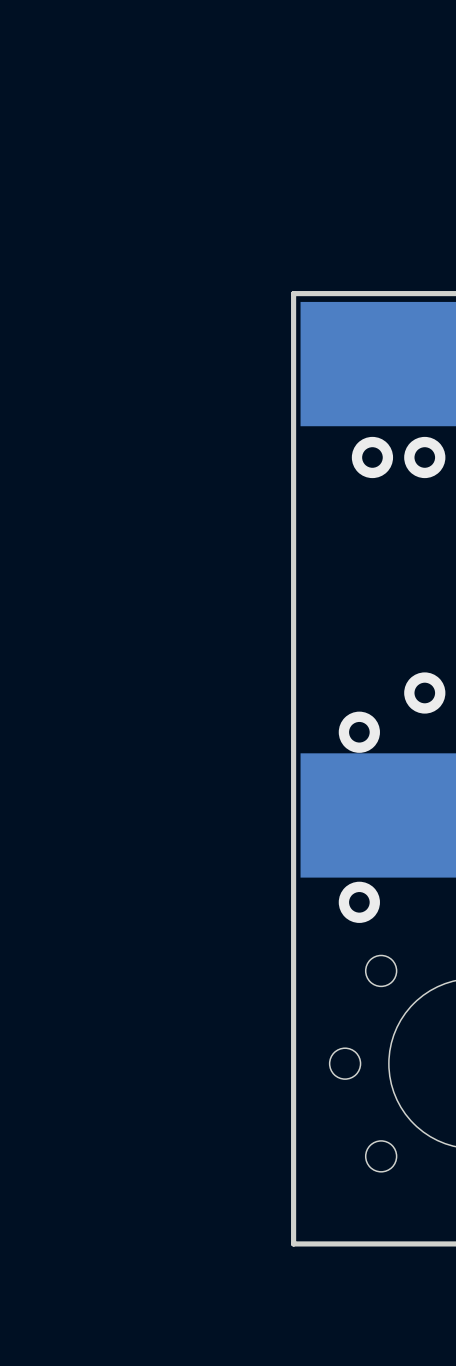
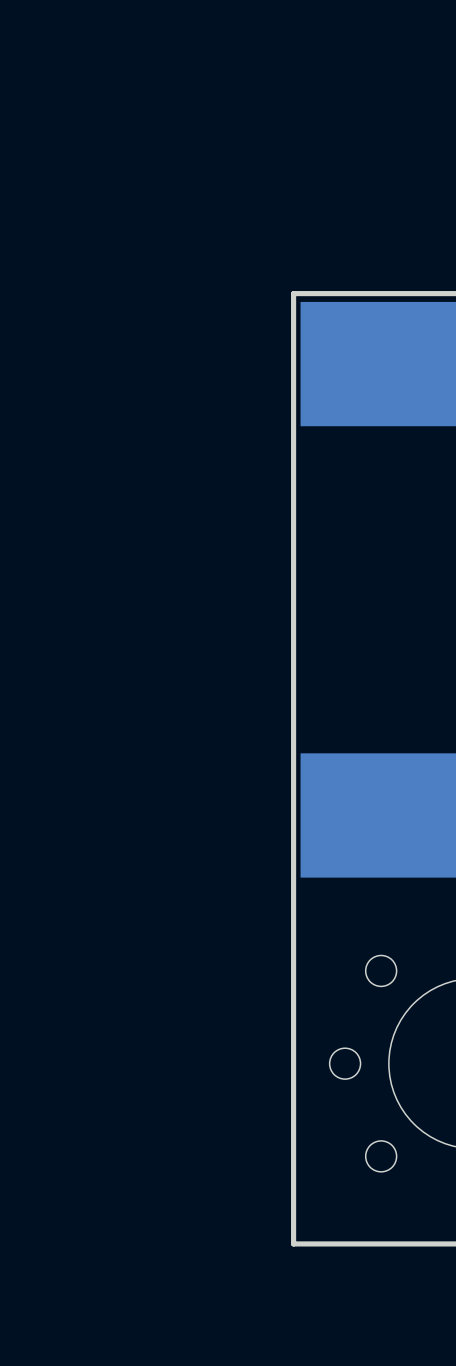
via: (372, 457) -> none
via: (424, 457) -> none
via: (424, 692) -> none
via: (359, 732) -> none
via: (359, 902) -> none

